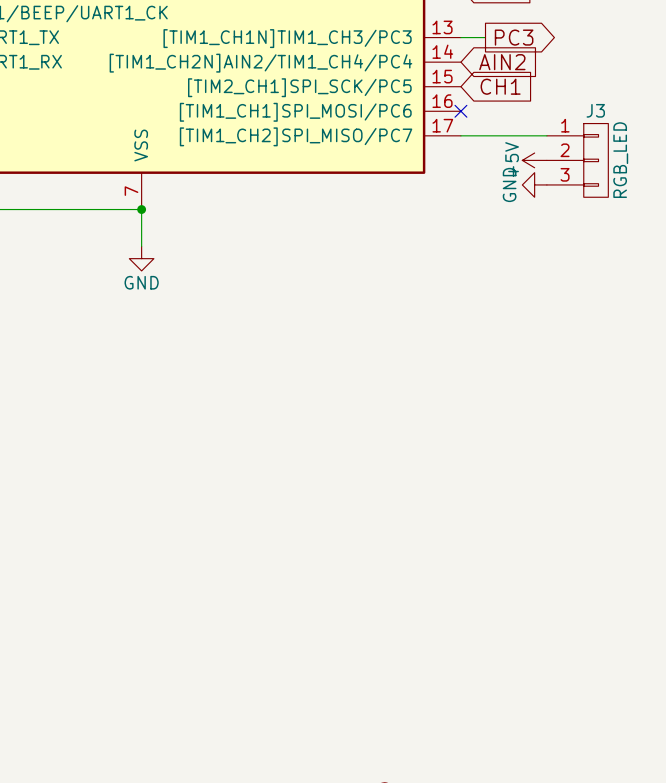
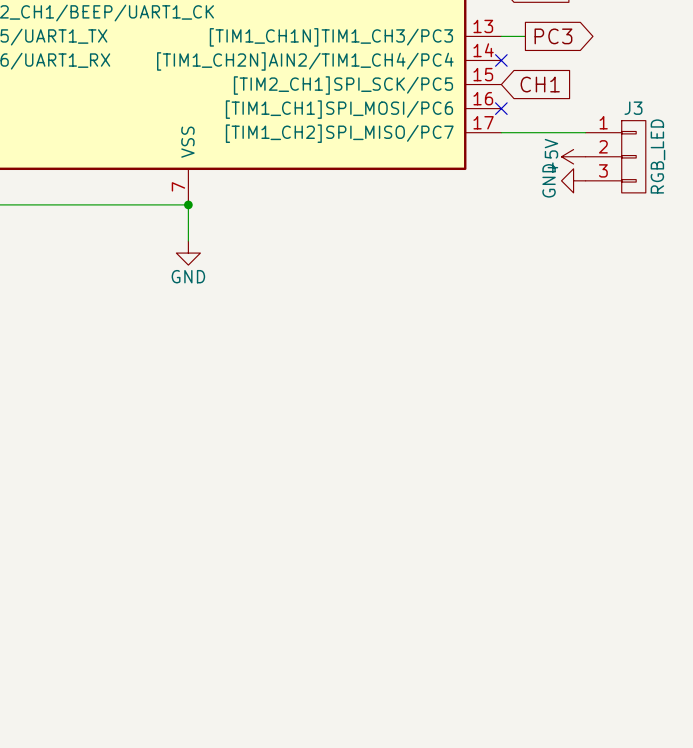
no-connect mark: none -> (501, 60)
global label: AIN2 (502, 62) -> none

